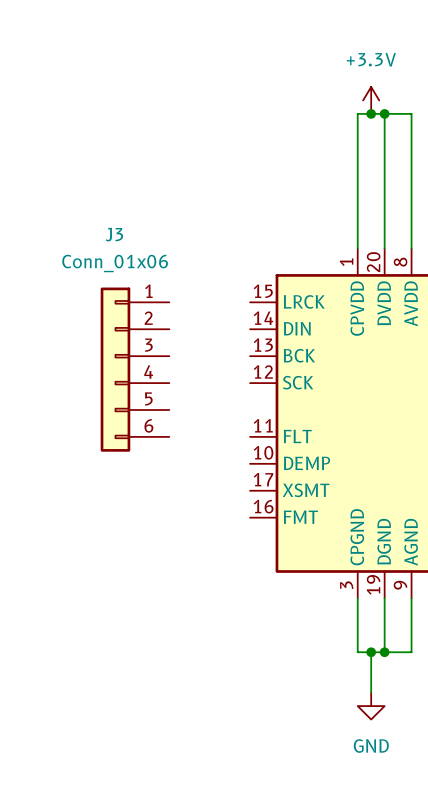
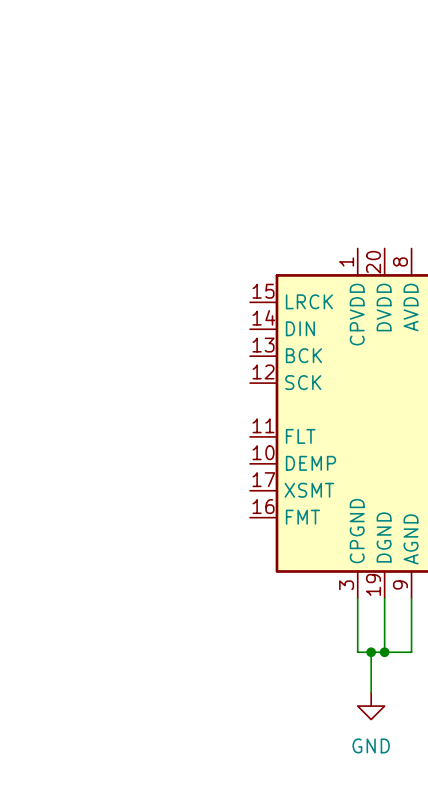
power symbol: +3.3V (371, 100) -> none
junction: (371, 113) -> none
wire: (384, 113) (384, 248) -> none
junction: (384, 113) -> none
wire: (357, 248) (357, 113) (411, 113) (411, 248) -> none
J3: Conn_01x06 (134, 369) -> none

